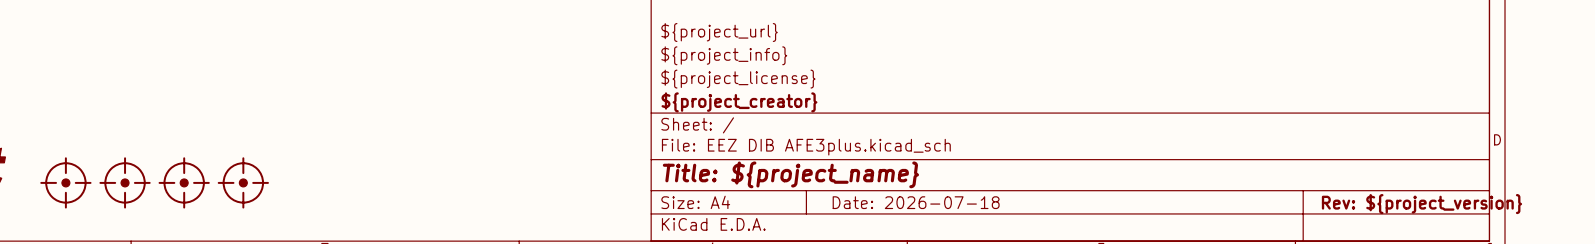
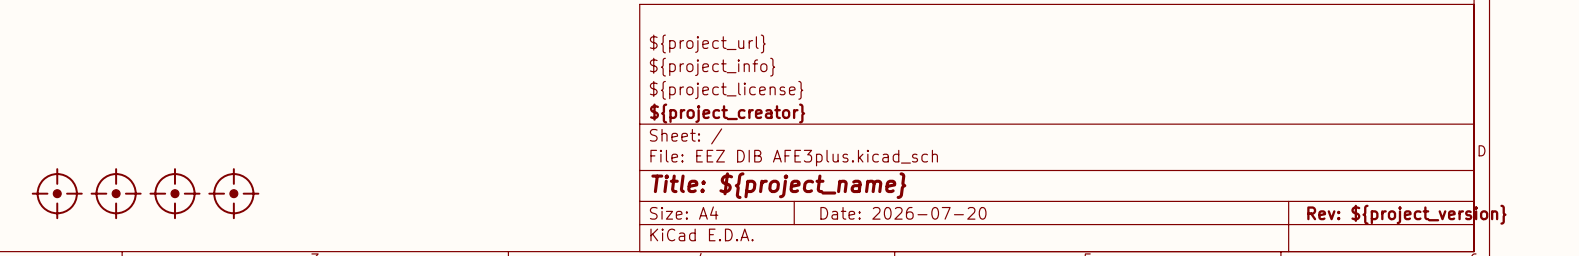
title block: Date: 2026-07-18 (916, 202) -> Date: 2026-07-20 (903, 213)

